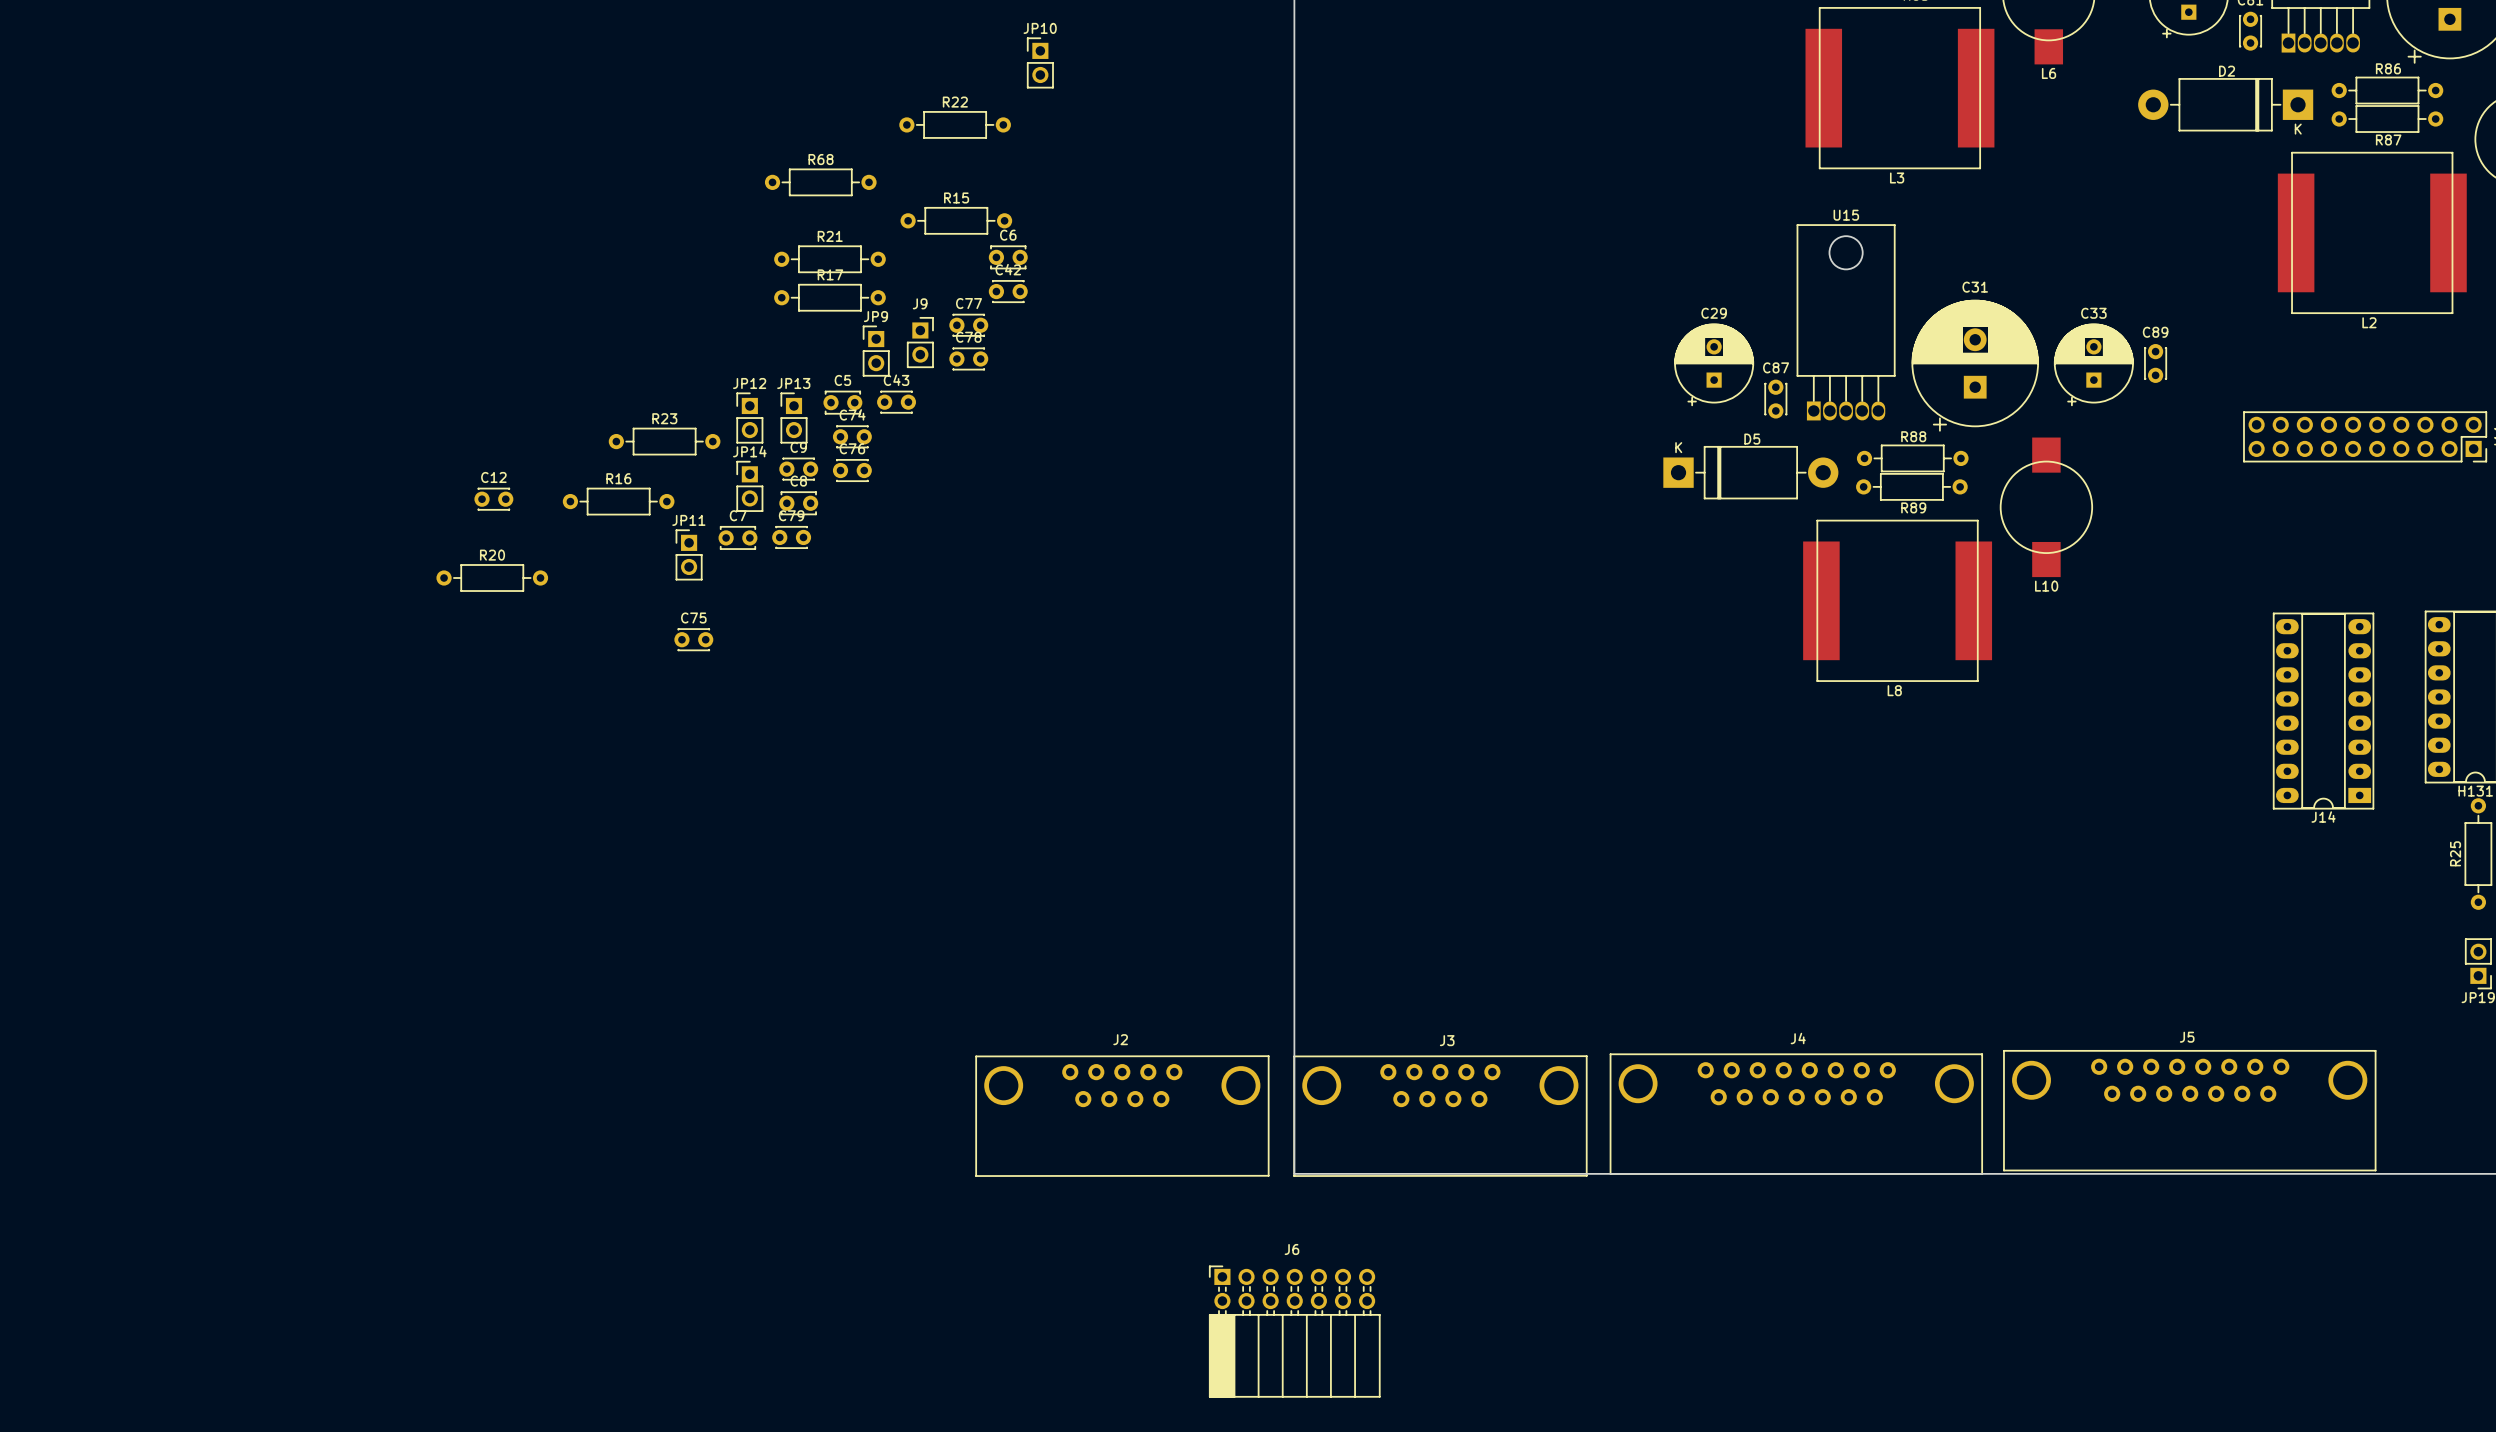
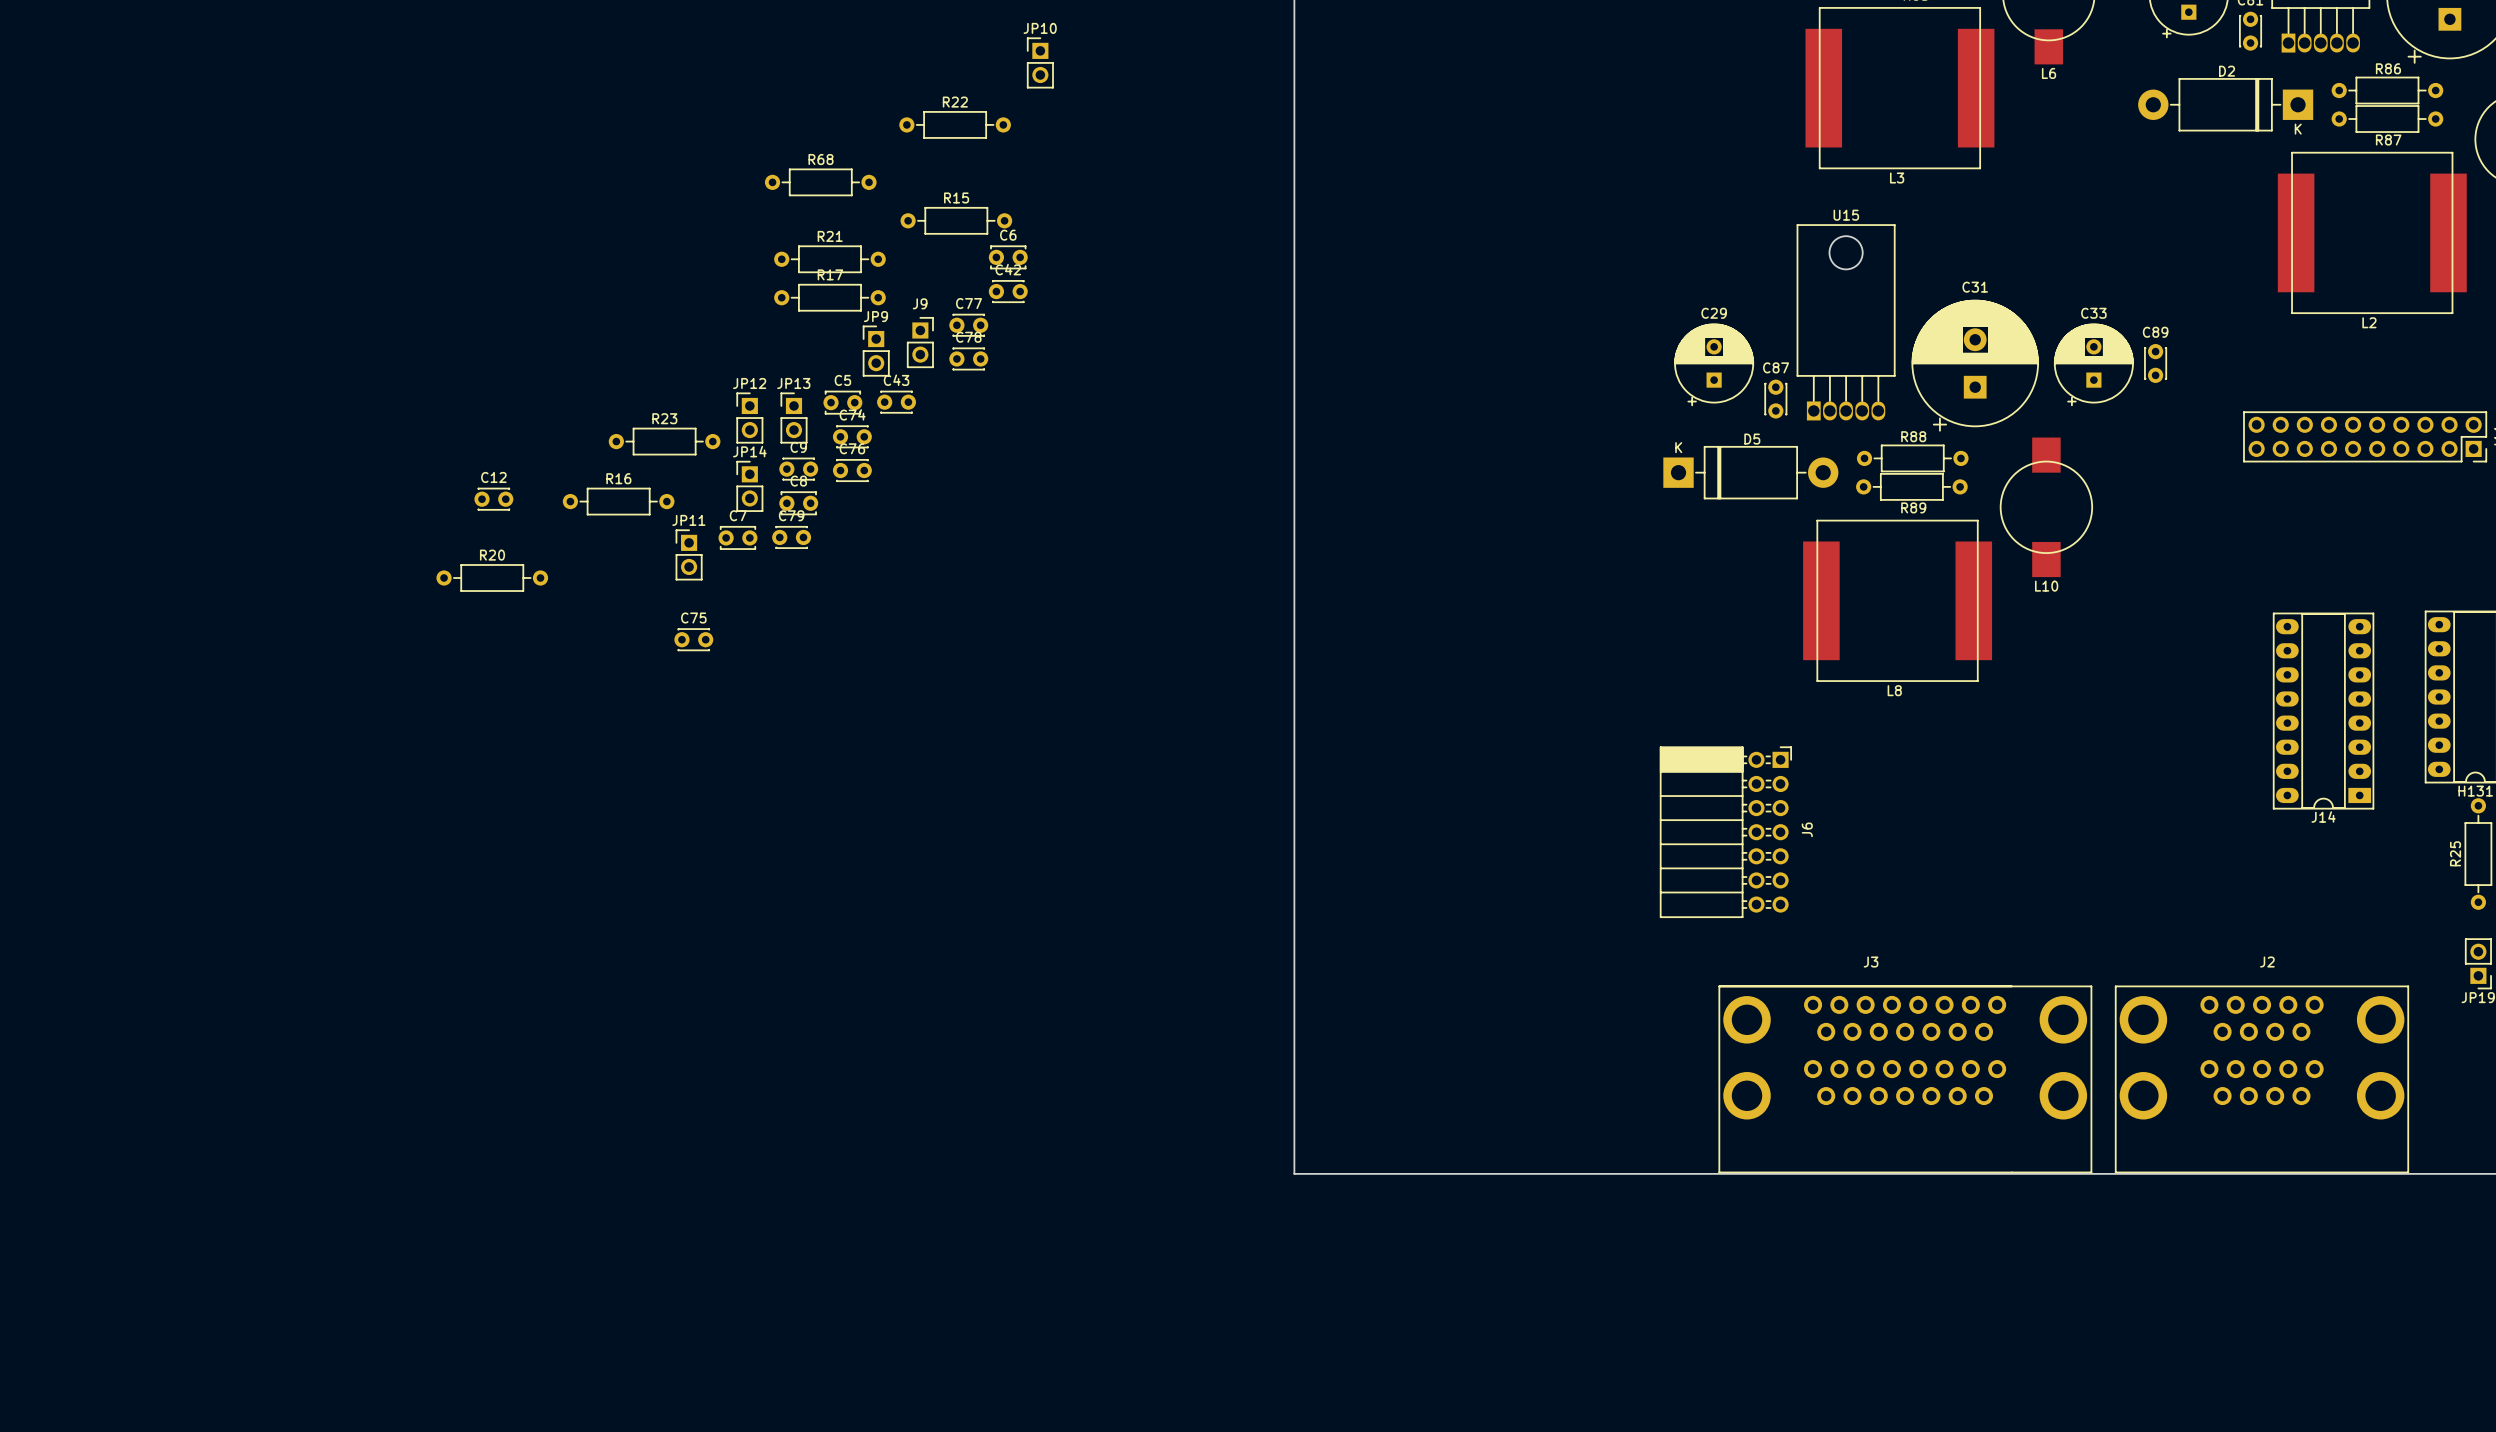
J2 name position: J2 (1120, 1039) -> J2 (2267, 962)
J3 name position: J3 (1447, 1040) -> J3 (1871, 962)
J2 footprint: [975, 1055, 1270, 1177] -> [2115, 985, 2409, 1174]
J3 footprint: [1293, 1055, 1588, 1177] -> [1718, 985, 2093, 1174]
J5: (2189, 1110) -> none
J4: (1796, 1114) -> none
J6 rotation: 0° (1294, 1331) -> 90° clockwise (1725, 832)
J6 position: (1294, 1331) -> (1725, 832)

